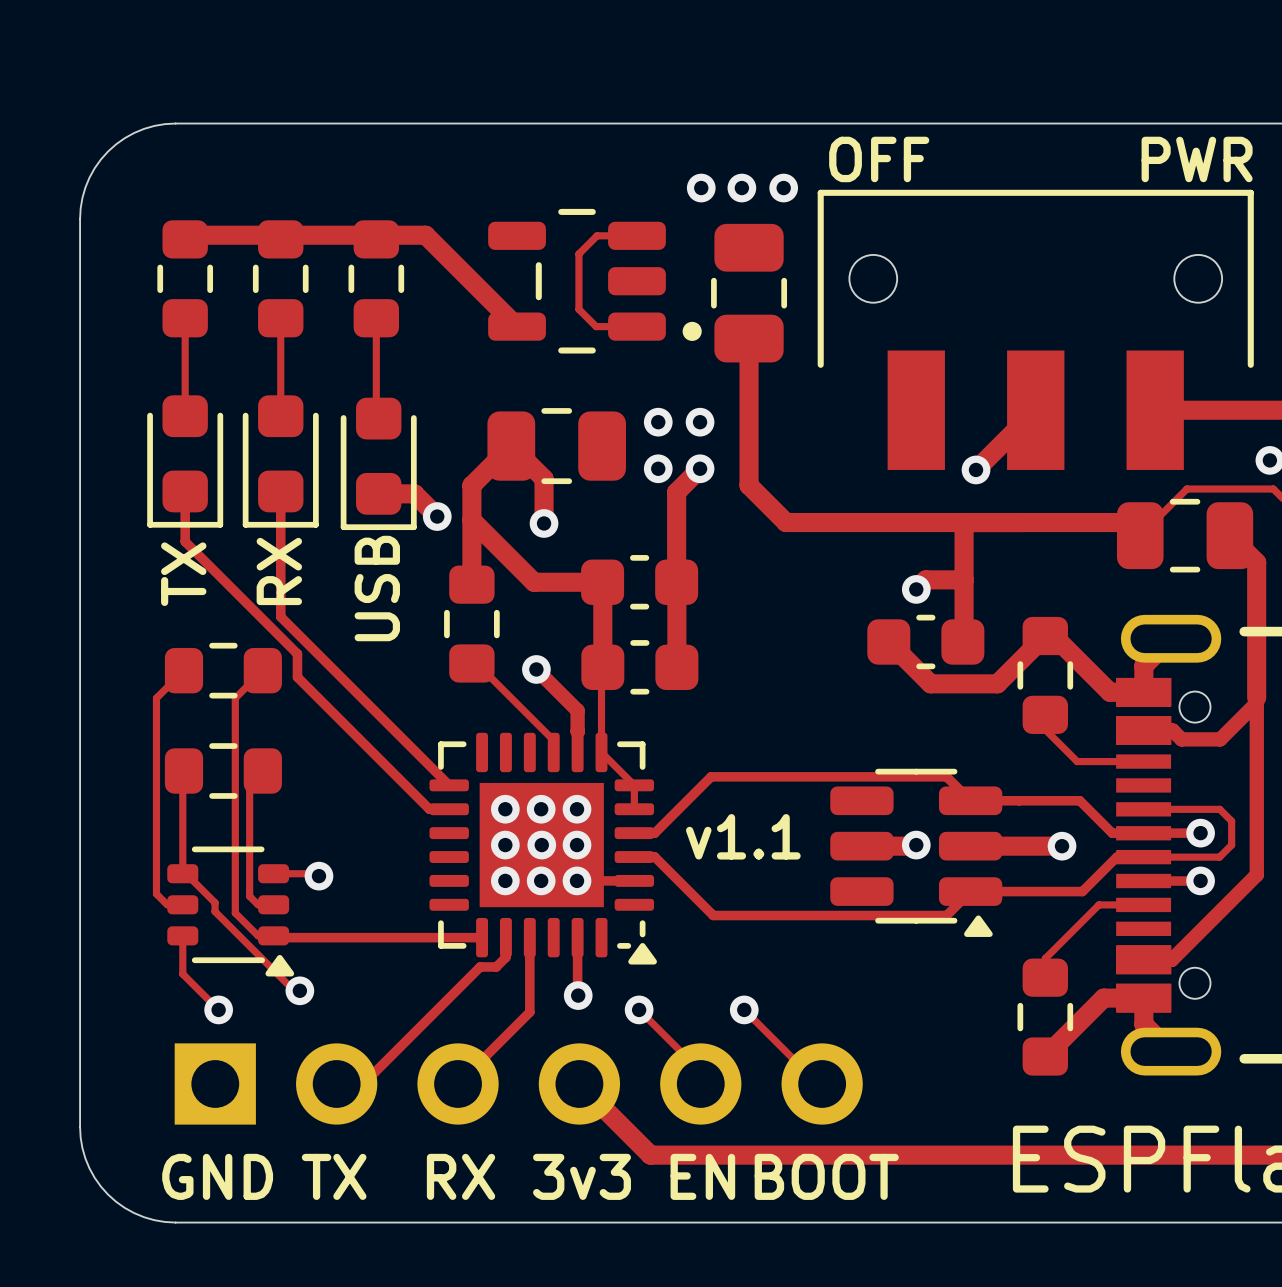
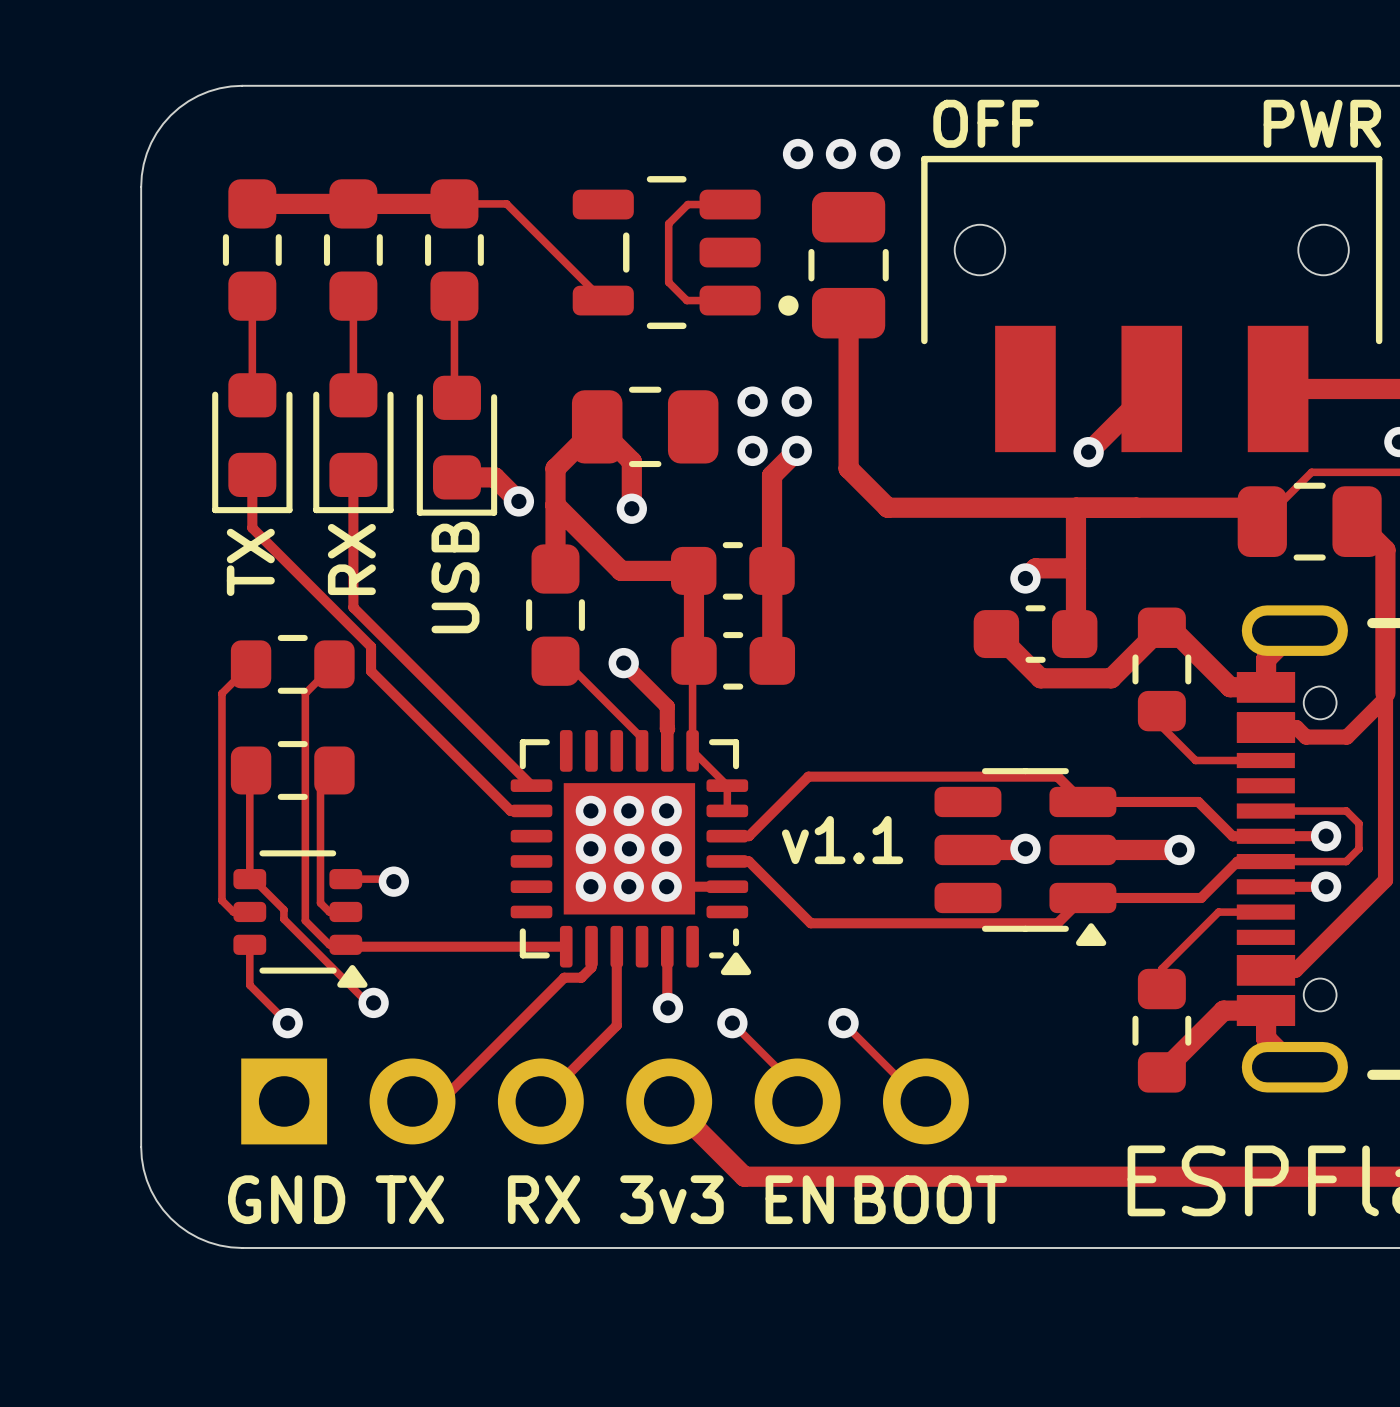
part footprint: [157, 220, 214, 338] -> [222, 179, 282, 321]
part footprint: [252, 220, 309, 338] -> [323, 179, 383, 321]
part footprint: [348, 220, 405, 338] -> [425, 179, 484, 321]
track width: thick (387, 235) (425, 235) (517, 326) -> thin (466, 203) (506, 203) (603, 300)
part footprint: [444, 565, 500, 683] -> [526, 544, 585, 686]

